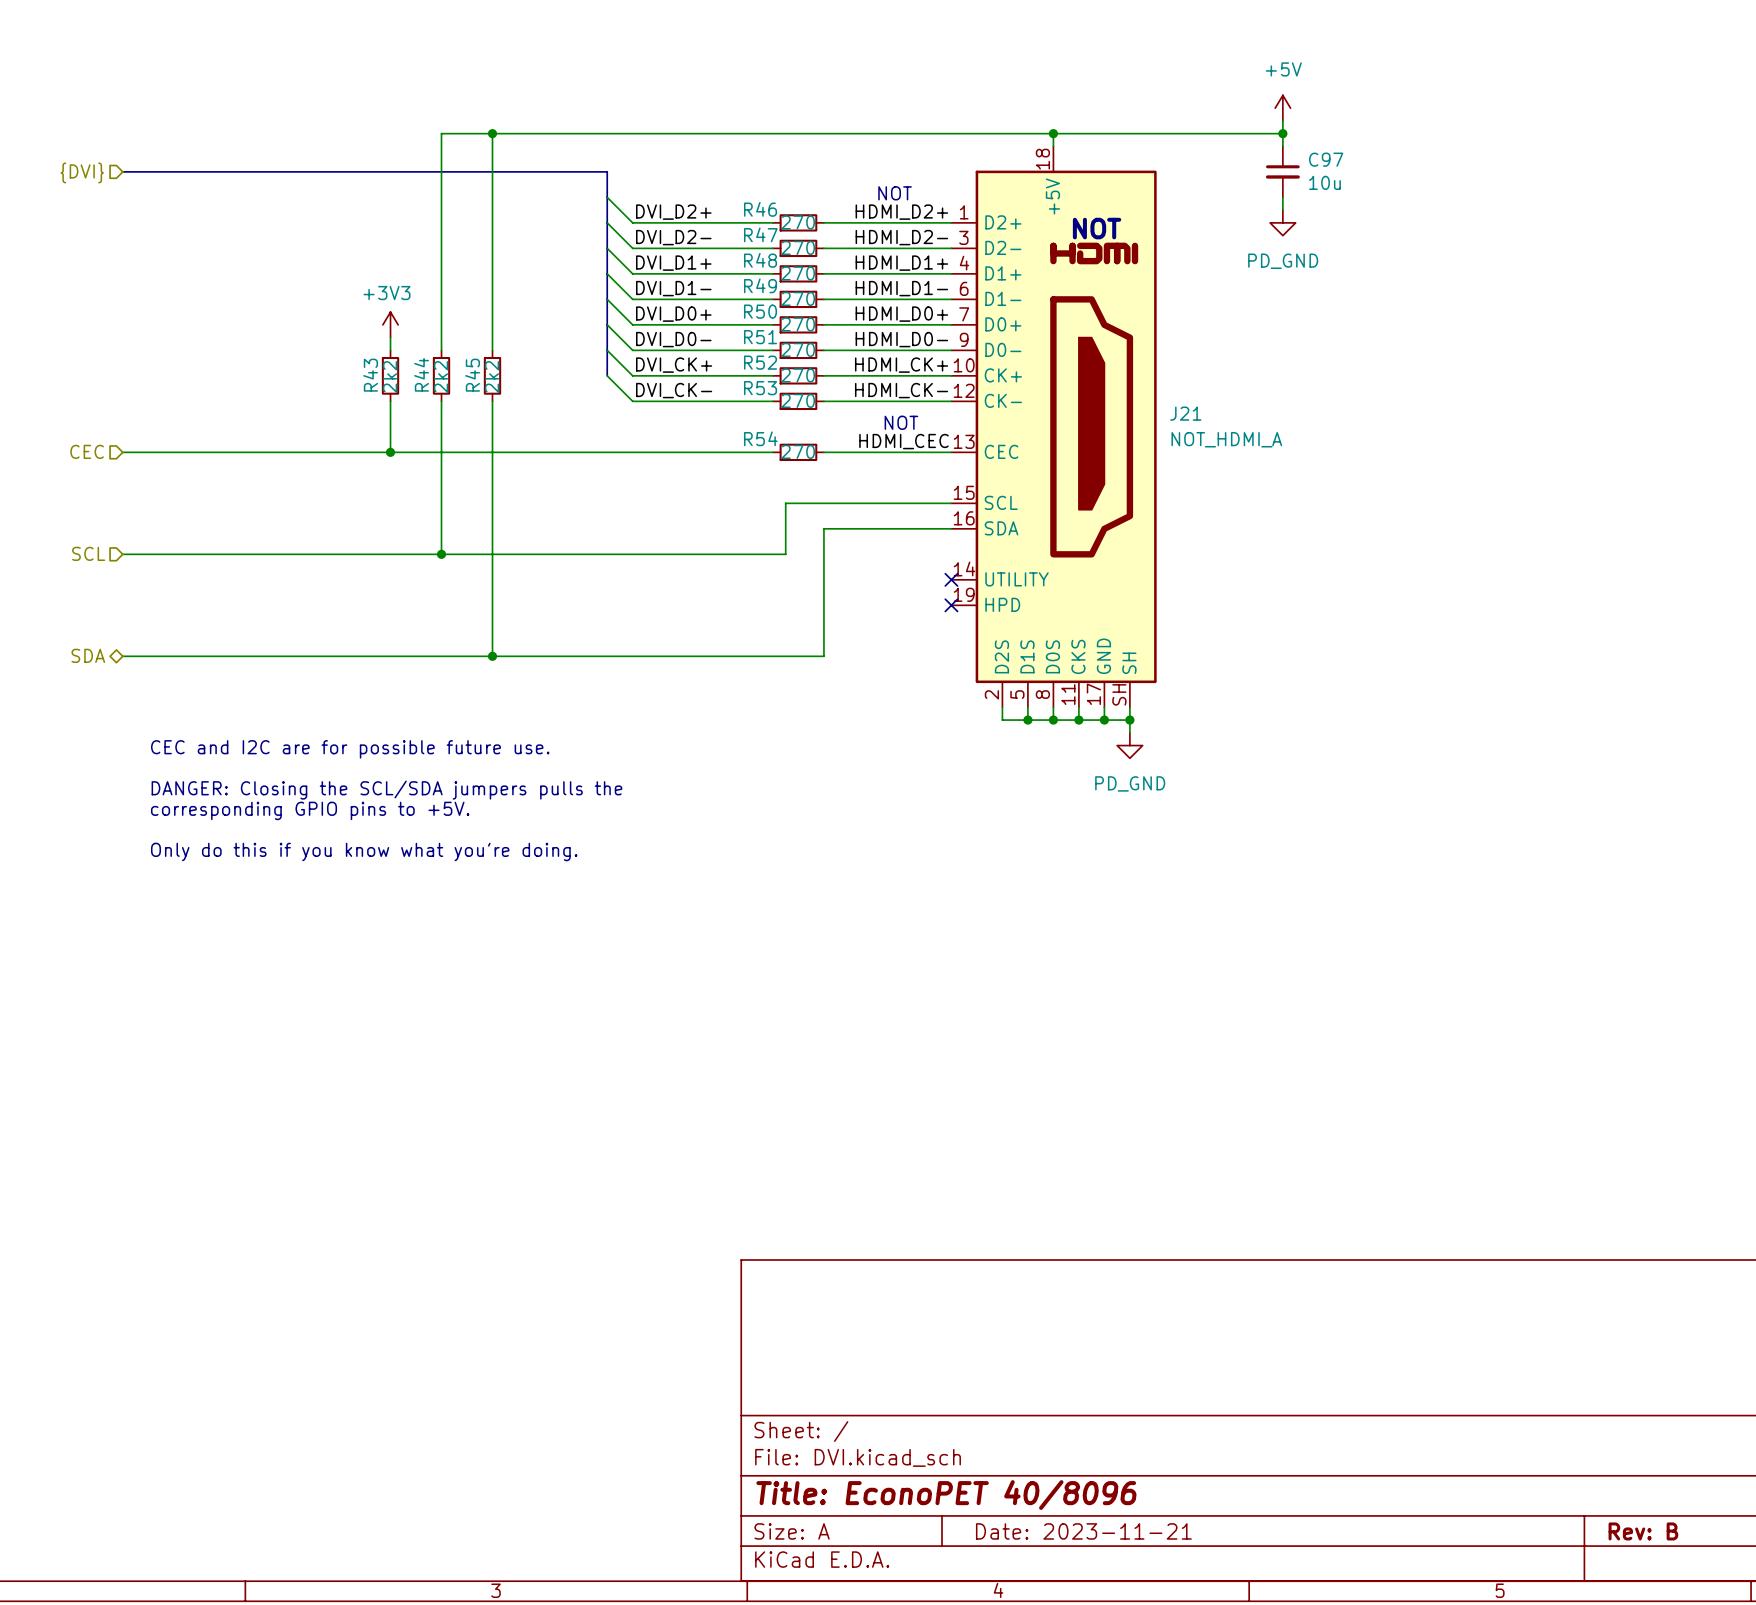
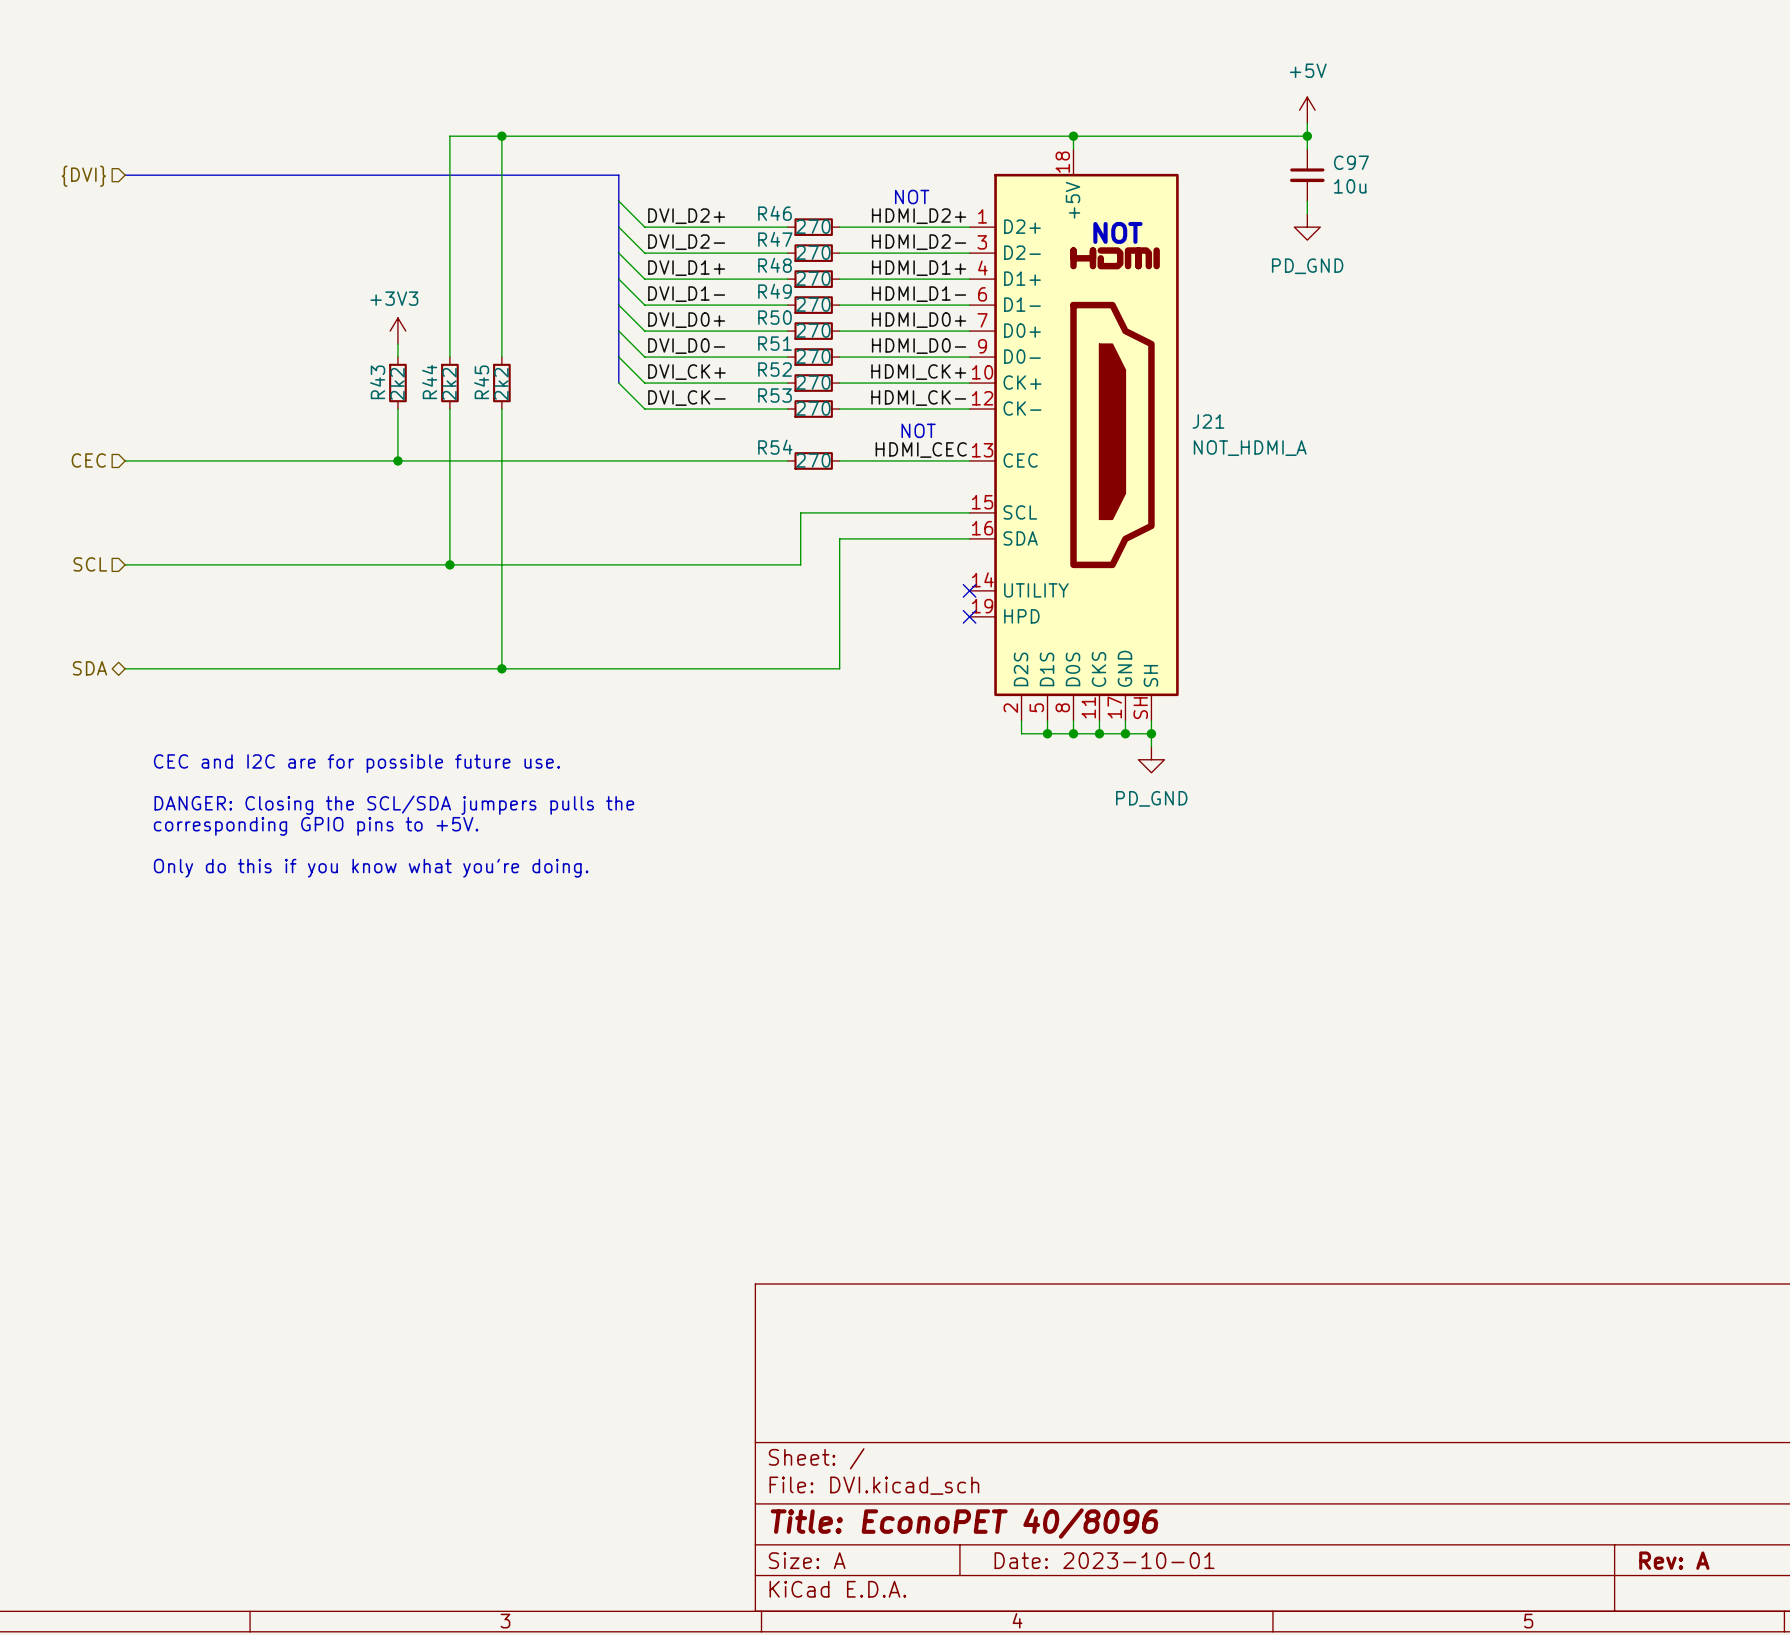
title block: Date: 2023-11-21 (1083, 1531) -> Date: 2023-10-01 (1104, 1560)
title block: Rev: B (1643, 1531) -> Rev: A (1674, 1560)

